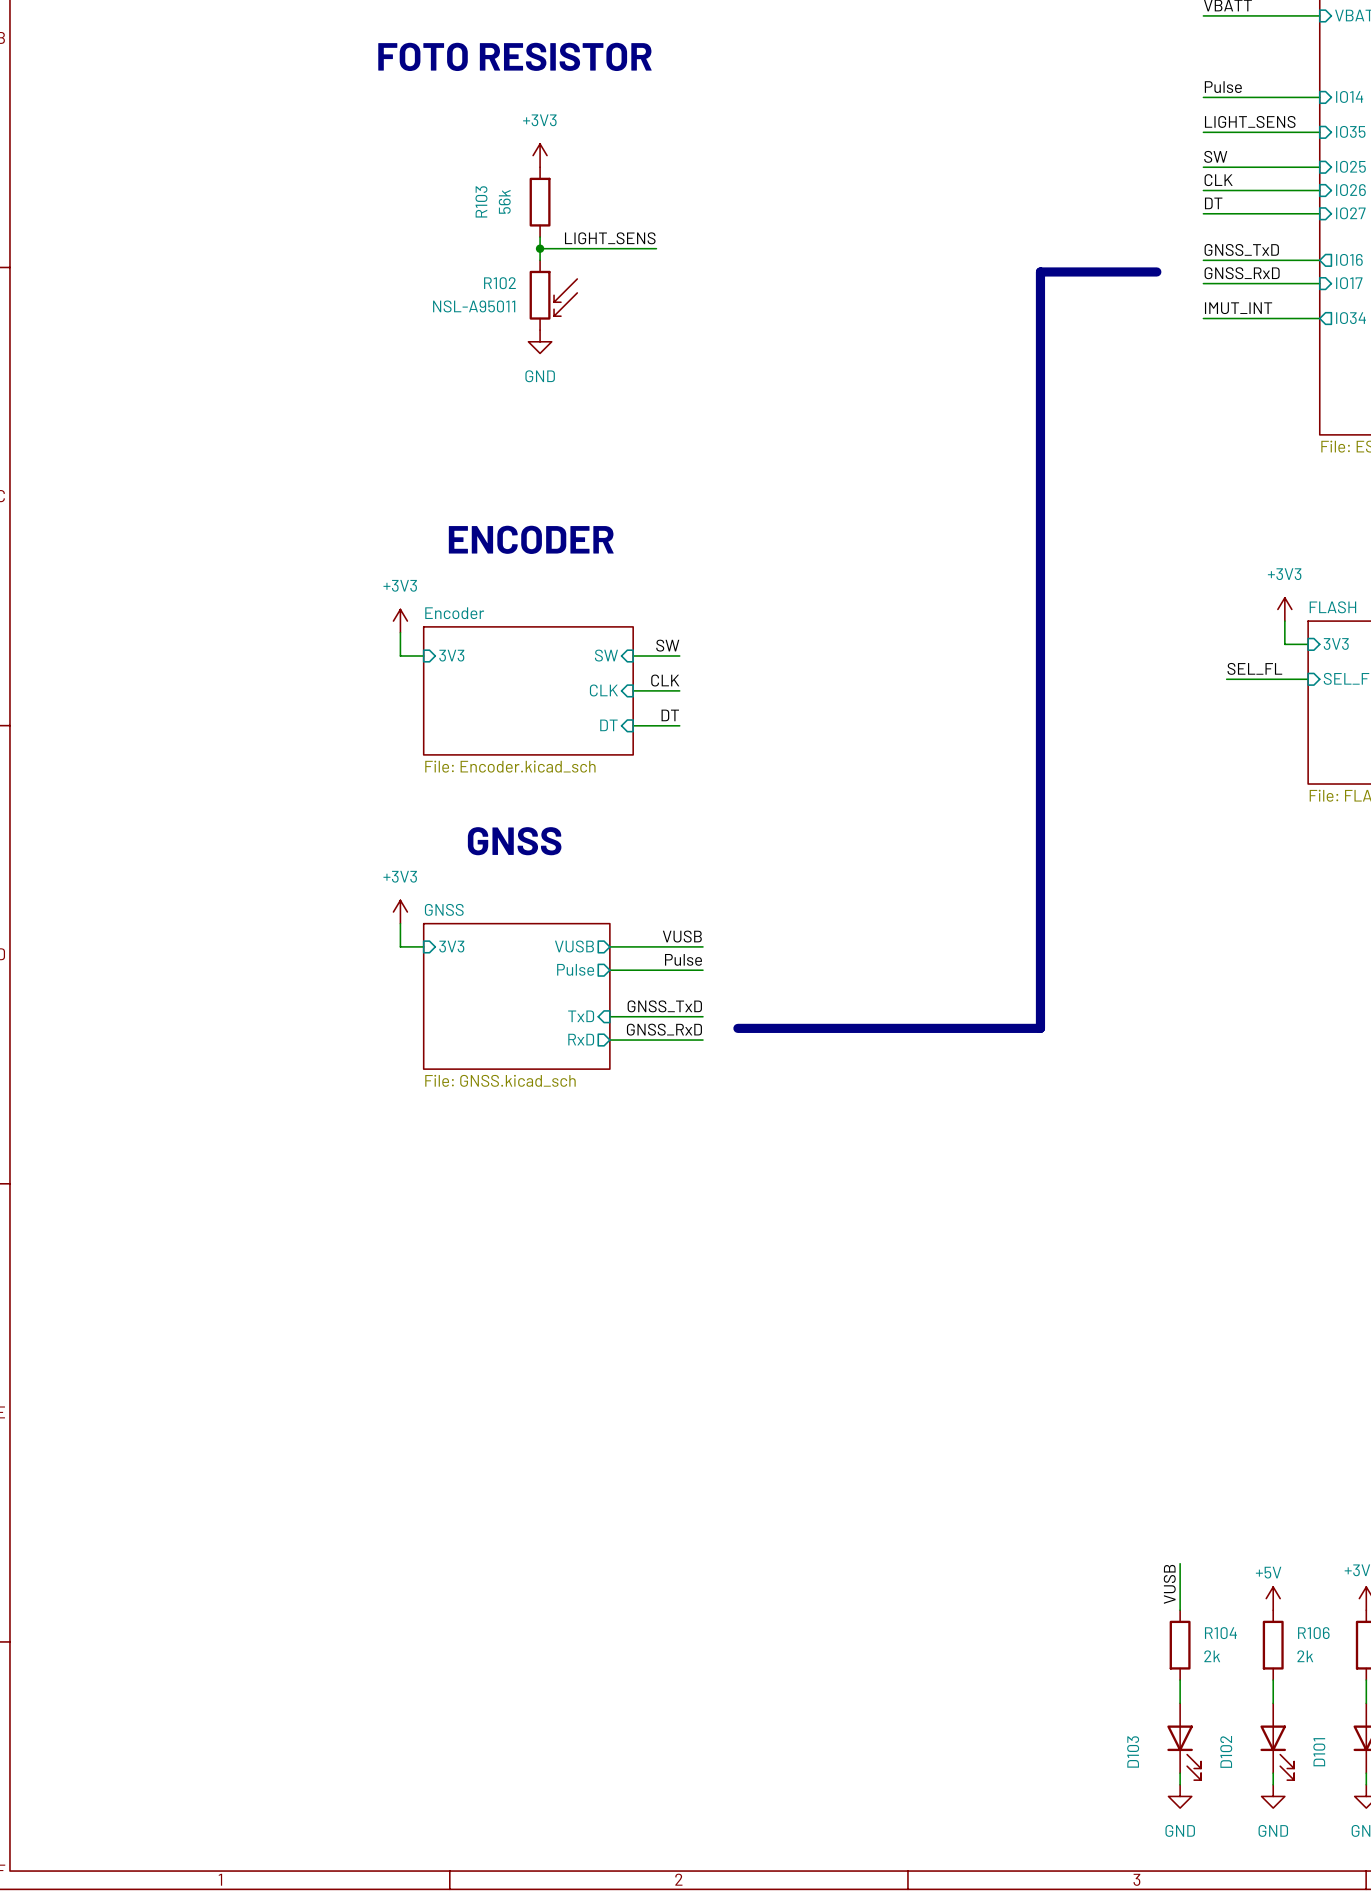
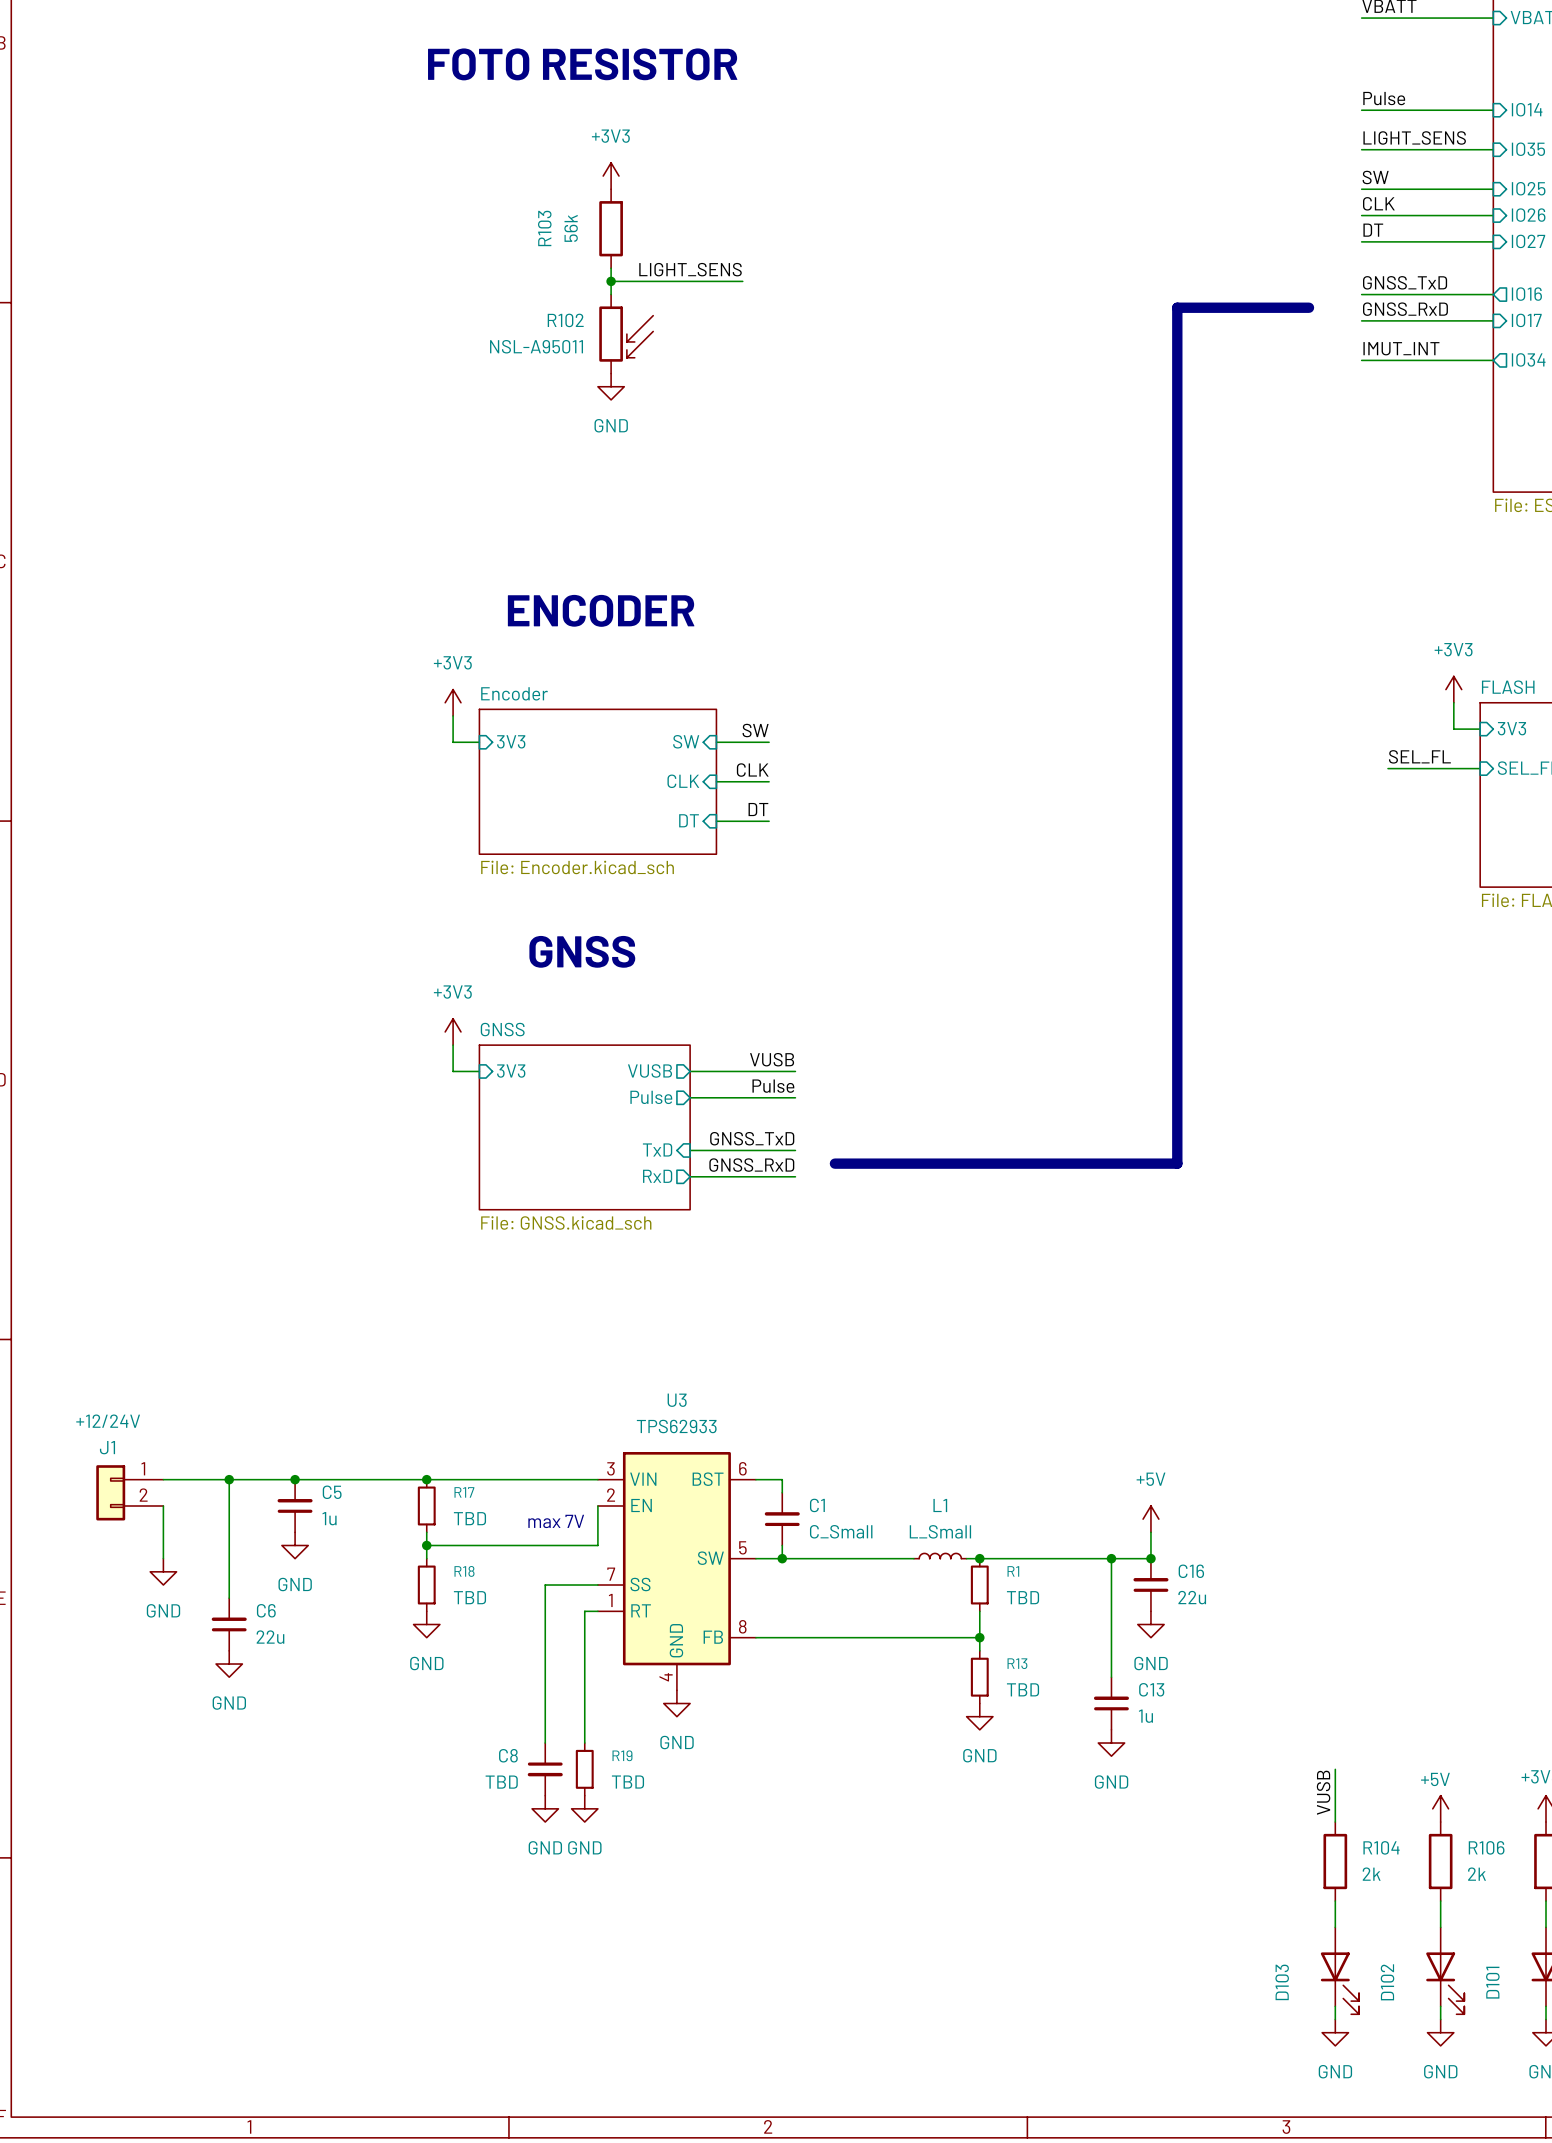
wire: none -> (163, 1479) (597, 1479)
wire: none -> (229, 1479) (229, 1598)
junction: none -> (229, 1479)
junction: none -> (295, 1479)
junction: none -> (426, 1479)
wire: none -> (755, 1479) (782, 1479) (782, 1492)
J1: none -> +12/24V (129, 1492)
wire: none -> (163, 1506) (163, 1558)
C5: none -> 1u (295, 1506)
R17: none -> TBD (426, 1506)
wire: none -> (597, 1506) (597, 1545) (426, 1545)
C1: none -> C_Small (782, 1519)
power symbol: none -> +5V (1150, 1519)
text: none -> max 7V (556, 1521)
wire: none -> (426, 1532) (426, 1558)
wire: none -> (1150, 1532) (1150, 1558) (966, 1558)
power symbol: none -> GND (295, 1545)
junction: none -> (426, 1545)
wire: none -> (782, 1545) (782, 1558)
L1: none -> L_Small (940, 1556)
wire: none -> (755, 1558) (913, 1558)
junction: none -> (782, 1558)
junction: none -> (979, 1558)
wire: none -> (1111, 1558) (1111, 1677)
junction: none -> (1111, 1558)
junction: none -> (1150, 1558)
U3: none -> TPS62933 (676, 1571)
power symbol: none -> GND (163, 1571)
R18: none -> TBD (426, 1585)
wire: none -> (597, 1585) (545, 1585) (545, 1743)
R1: none -> TBD (979, 1585)
C16: none -> 22u (1150, 1585)
wire: none -> (597, 1611) (584, 1611) (584, 1743)
wire: none -> (979, 1611) (979, 1650)
C6: none -> 22u (229, 1624)
power symbol: none -> GND (426, 1624)
power symbol: none -> GND (1150, 1624)
wire: none -> (755, 1637) (979, 1637)
junction: none -> (979, 1637)
power symbol: none -> GND (229, 1664)
R13: none -> TBD (979, 1677)
power symbol: none -> GND (676, 1703)
C13: none -> 1u (1111, 1703)
power symbol: none -> GND (979, 1716)
power symbol: none -> GND (1111, 1743)
C8: none -> TBD (545, 1769)
R19: none -> TBD (584, 1769)
power symbol: none -> GND (545, 1808)
power symbol: none -> GND (584, 1808)

